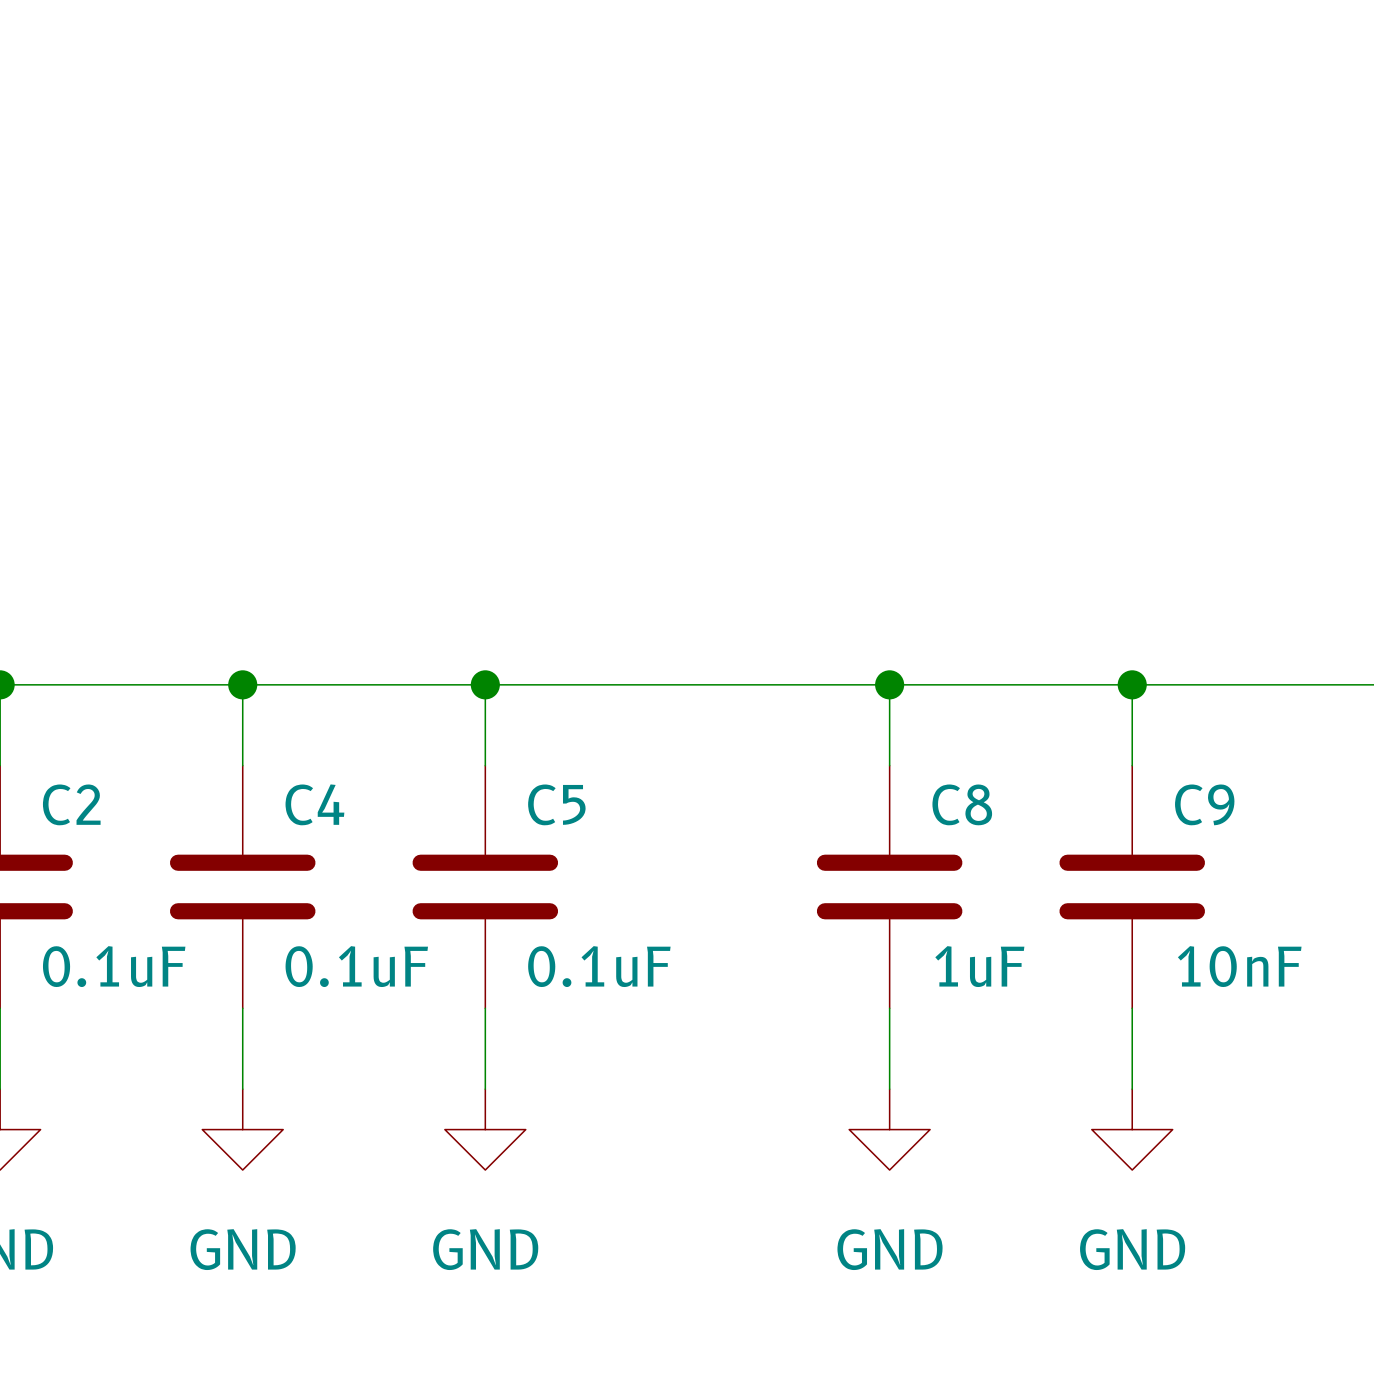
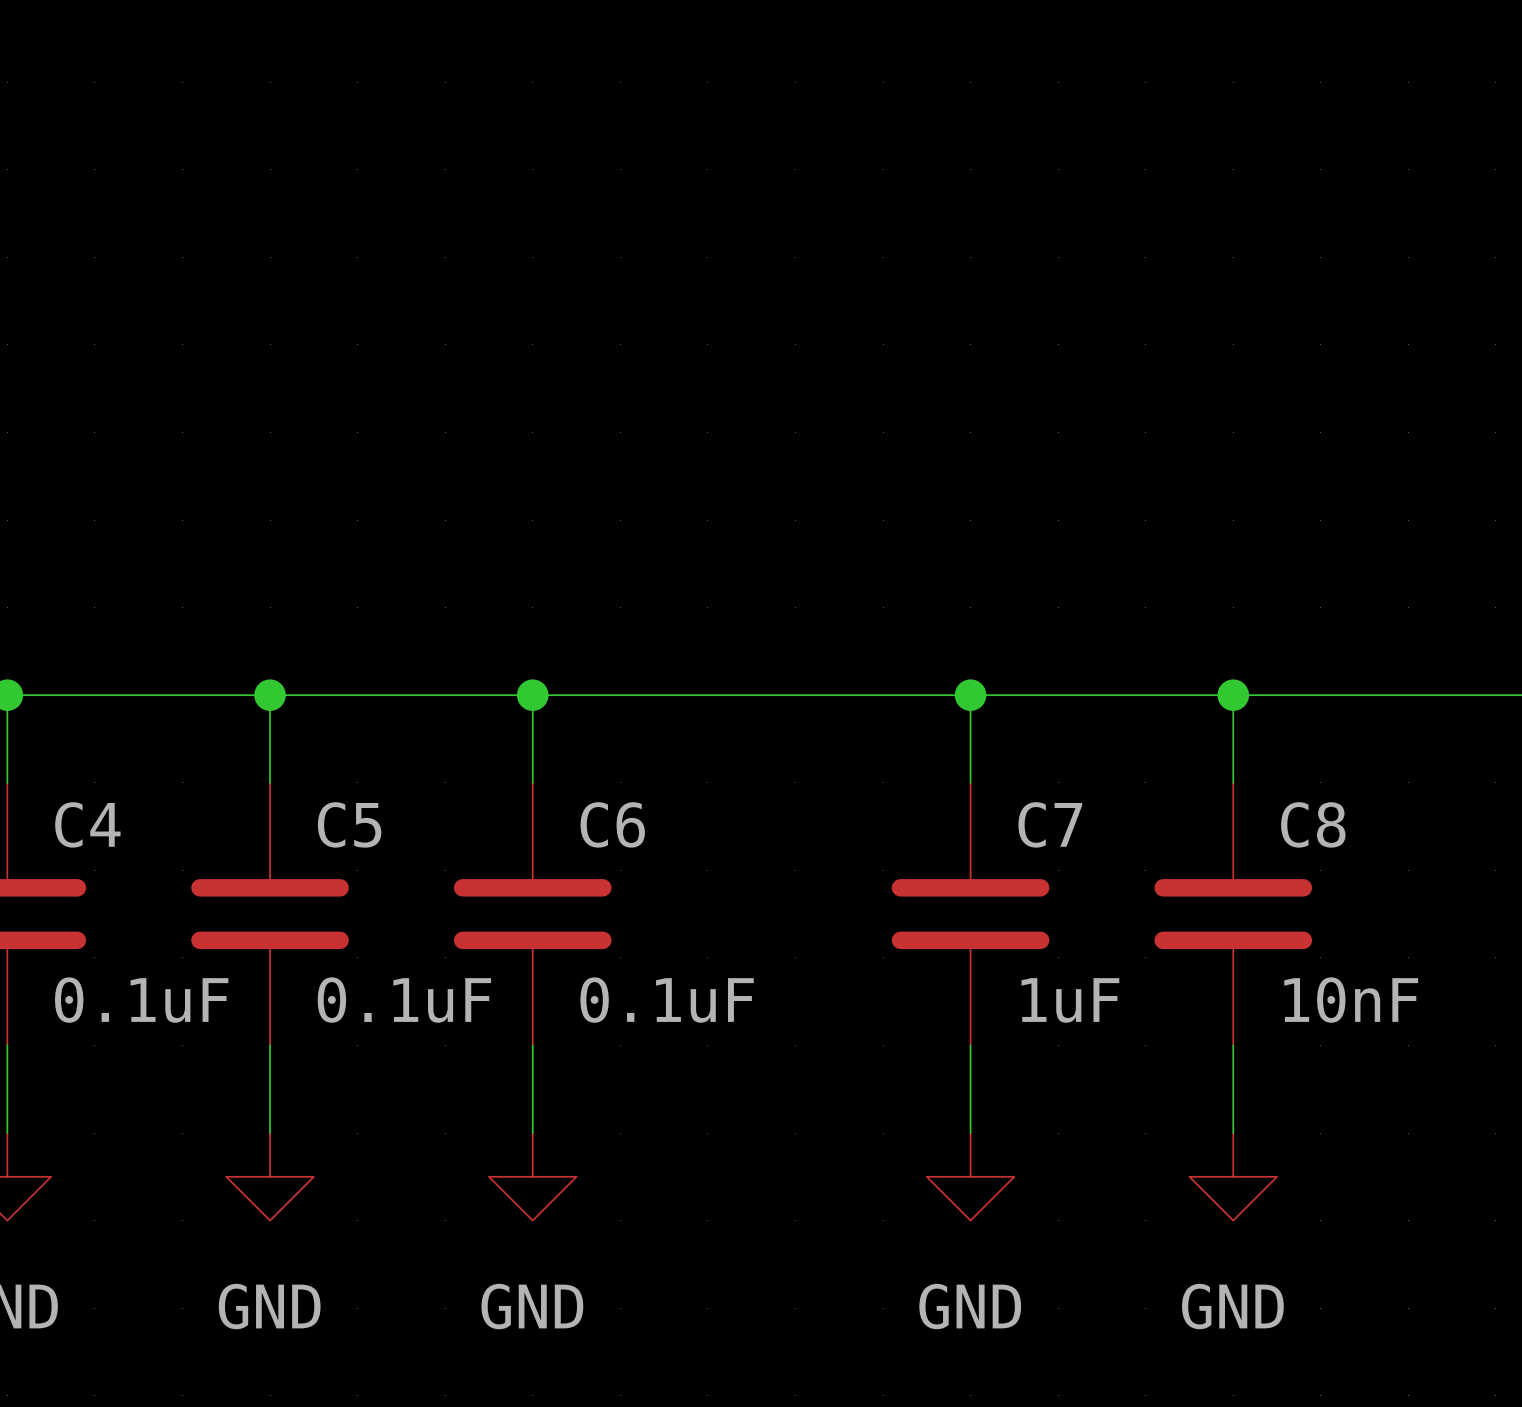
C2 name: C2 (71, 804) -> C4 (87, 824)
C4 name: C4 (314, 804) -> C5 (349, 824)
C5 name: C5 (556, 804) -> C6 (612, 824)
C8 name: C8 (962, 804) -> C7 (1050, 824)
C9 name: C9 (1204, 804) -> C8 (1313, 824)

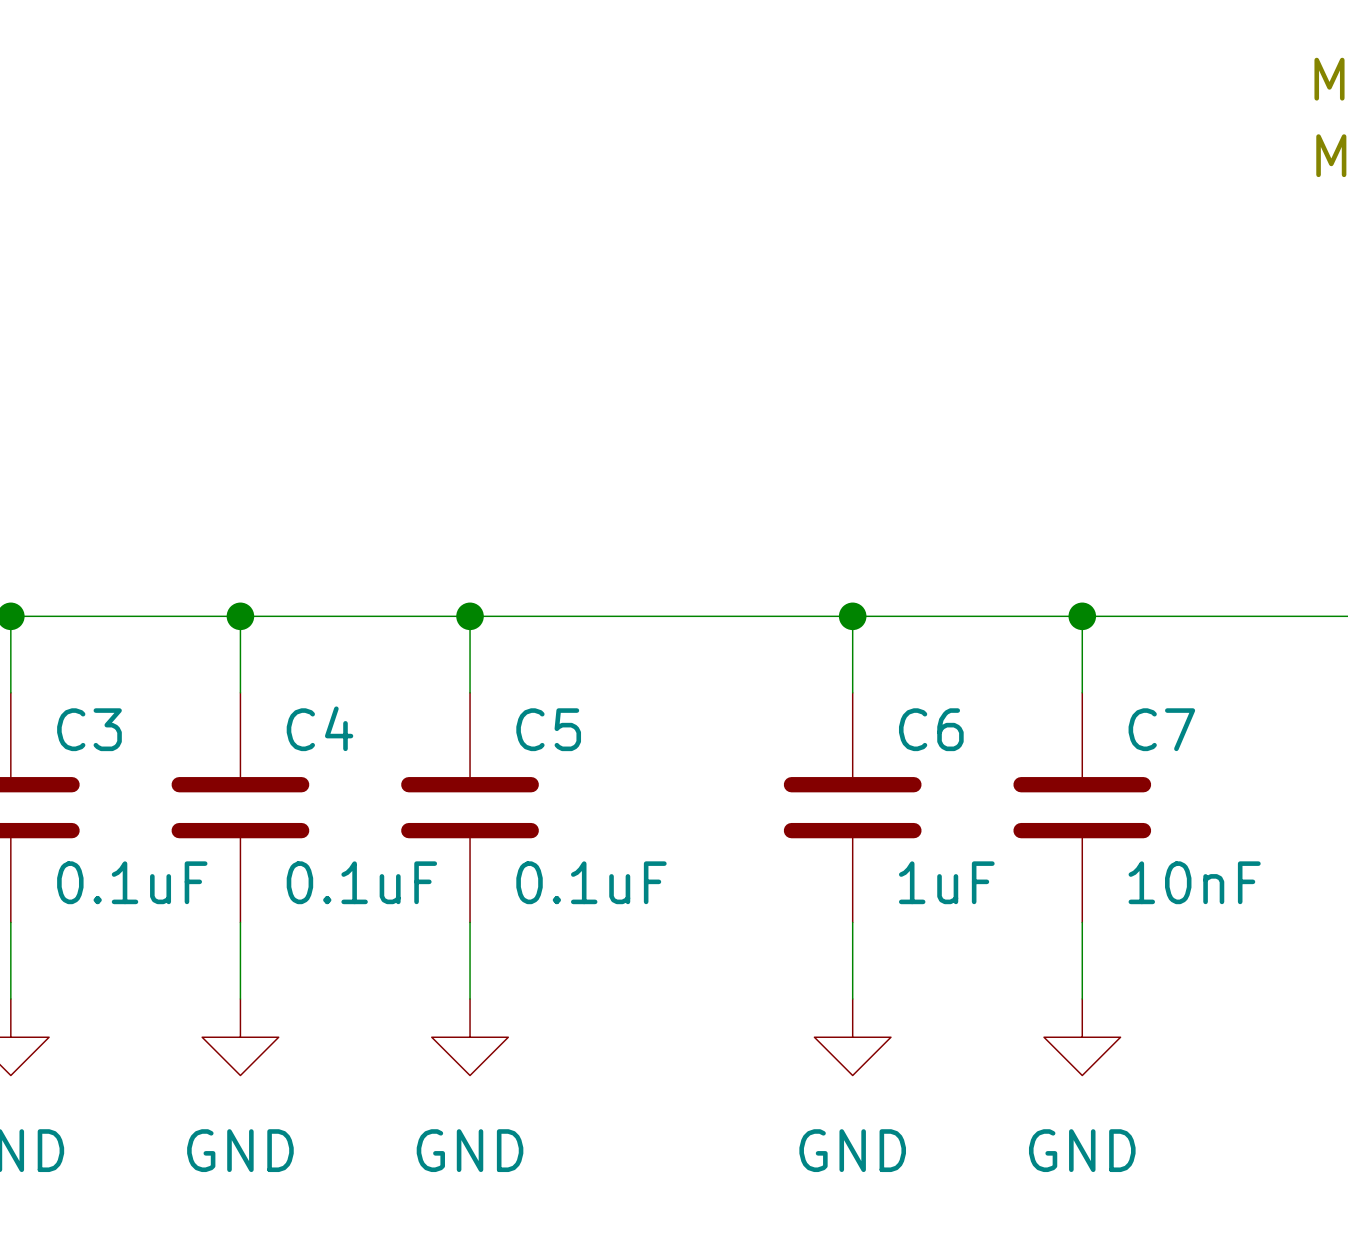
C4 name: C4 (87, 824) -> C3 (89, 729)
C5 name: C5 (349, 824) -> C4 (319, 728)
C6 name: C6 (612, 824) -> C5 (548, 729)
C7 name: C7 (1050, 824) -> C6 (931, 729)
C8 name: C8 (1313, 824) -> C7 (1161, 729)

